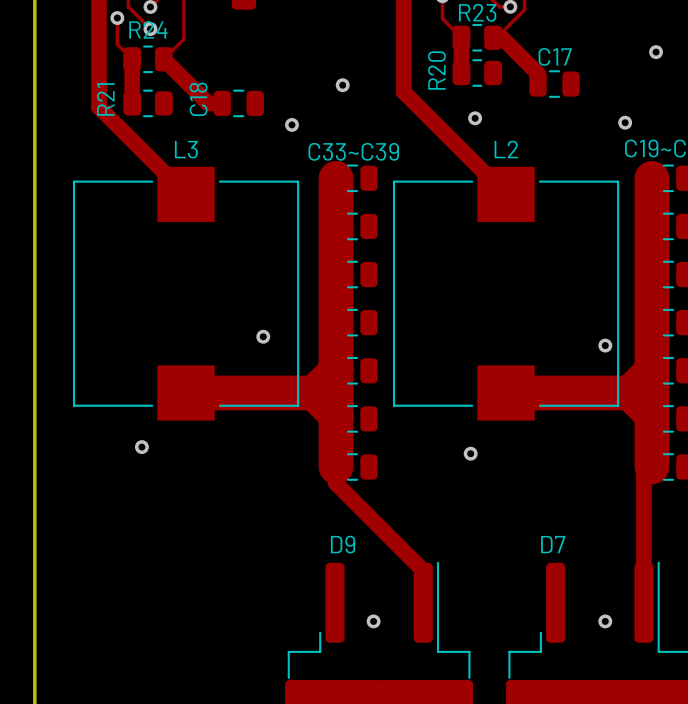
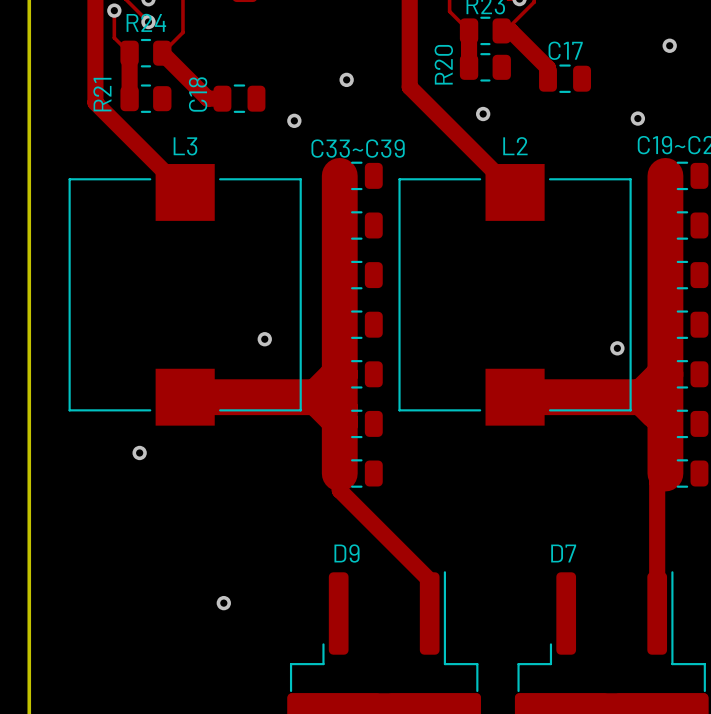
via: (470, 453) -> none
via: none -> (223, 603)
via: (373, 621) -> none
via: (605, 621) -> none

